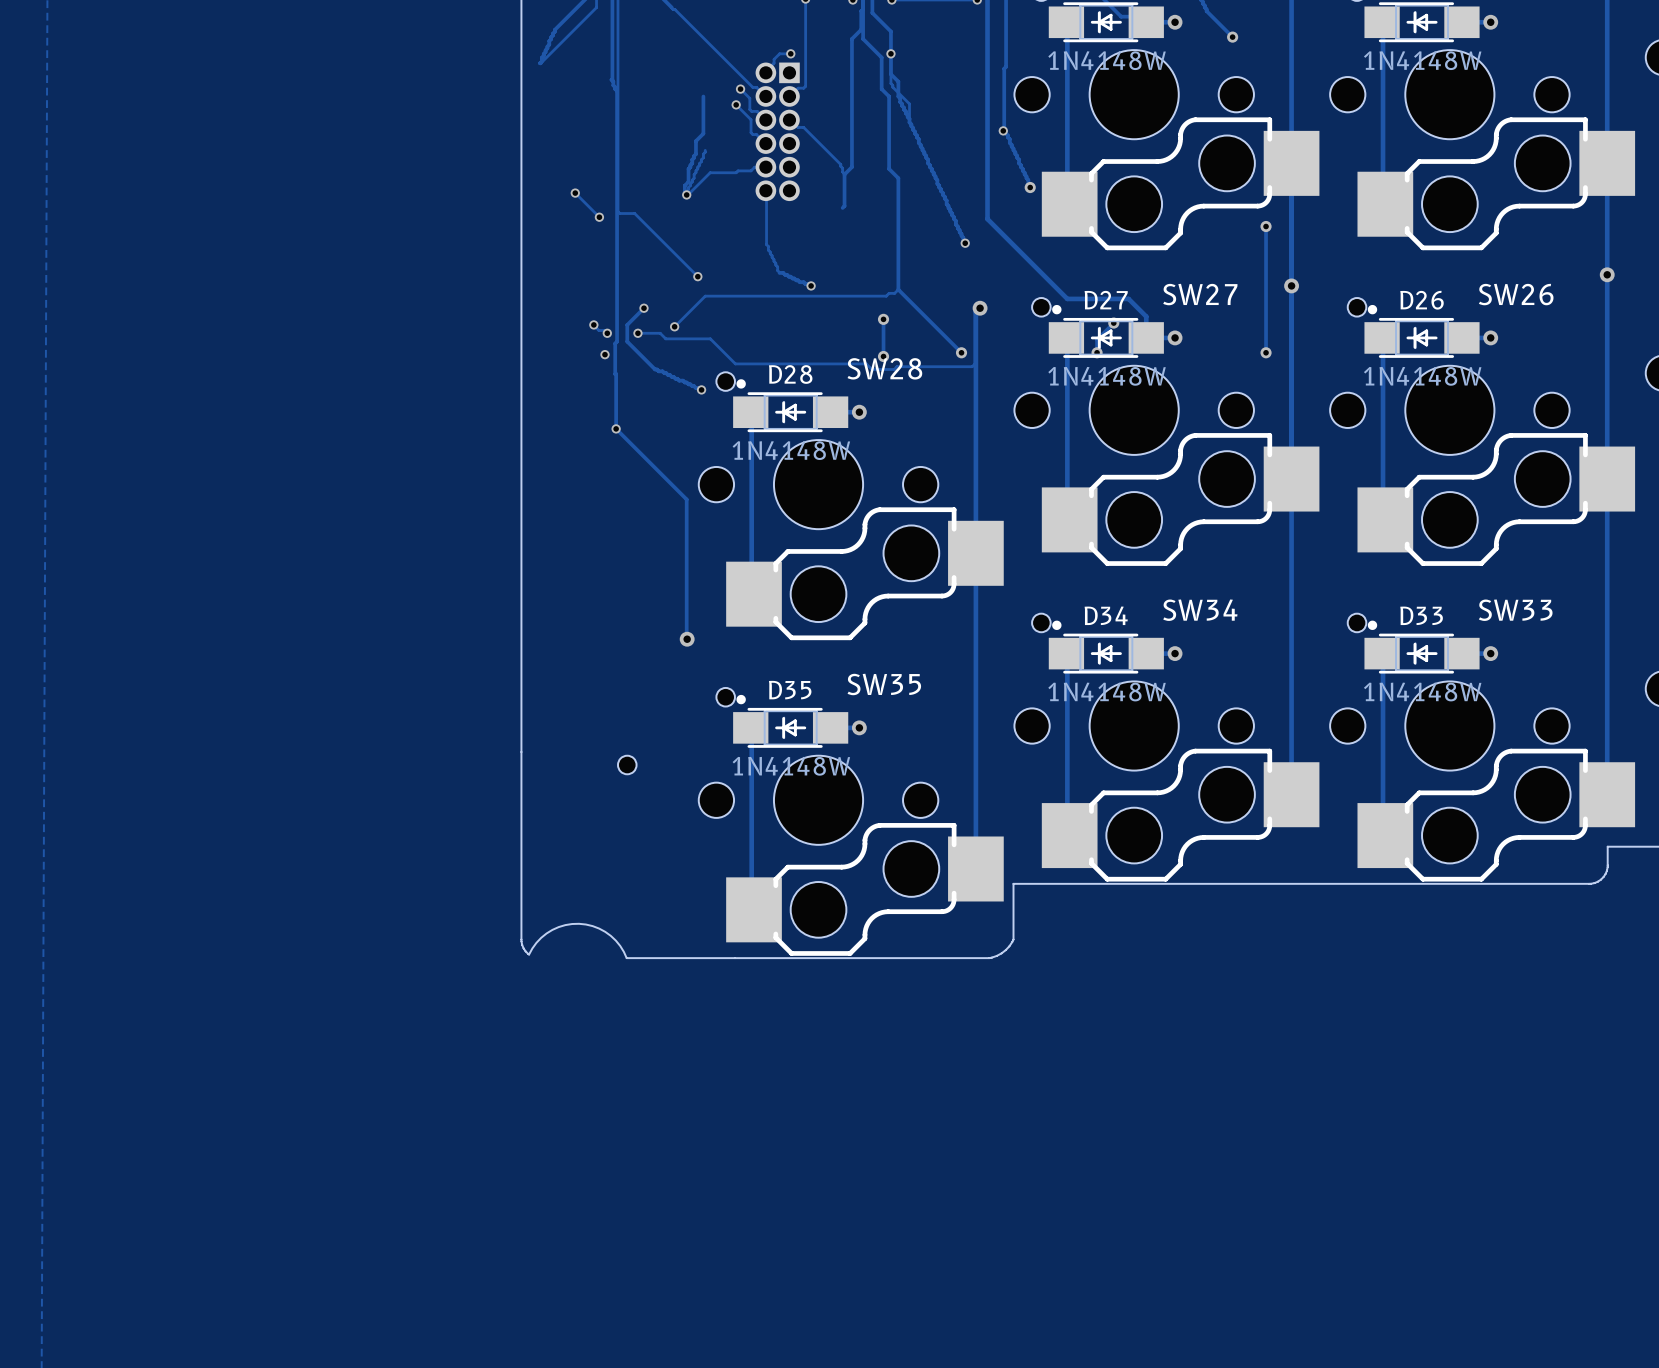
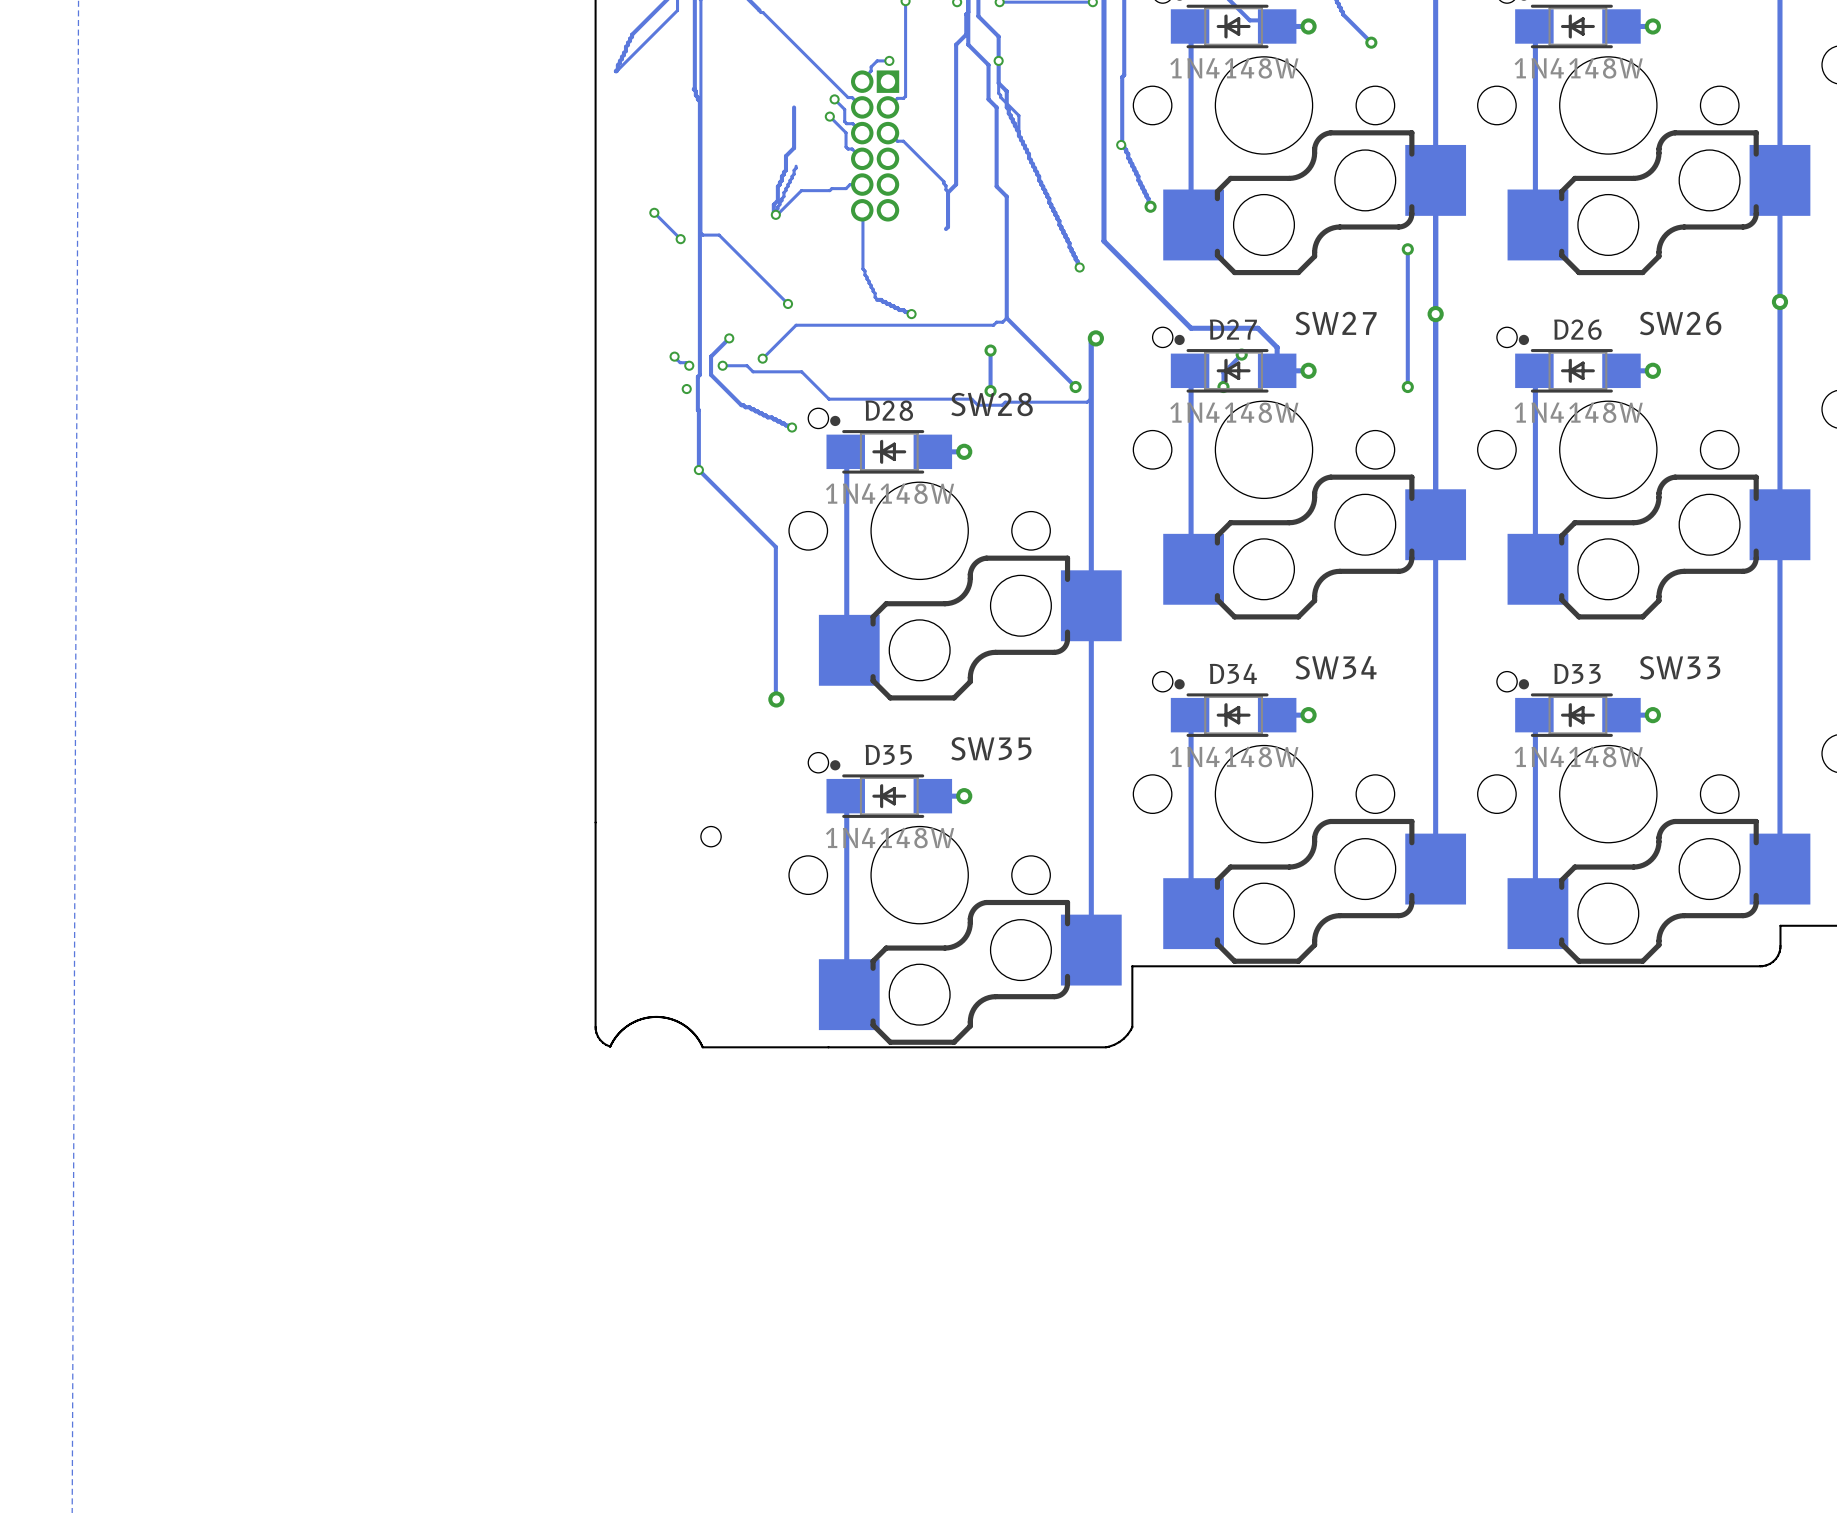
board edge: (529, 954) (541, 937) (552, 929) (565, 925) (579, 923) (592, 926) (605, 931) (620, 945) (626, 958) -> (702, 1047) (710, 1047)
board edge: none -> (603, 1043) (609, 1046)
board edge: none -> (610, 1046) (618, 1034) (629, 1024) (641, 1019) (656, 1016) (671, 1019) (684, 1025) (694, 1034) (702, 1047)

